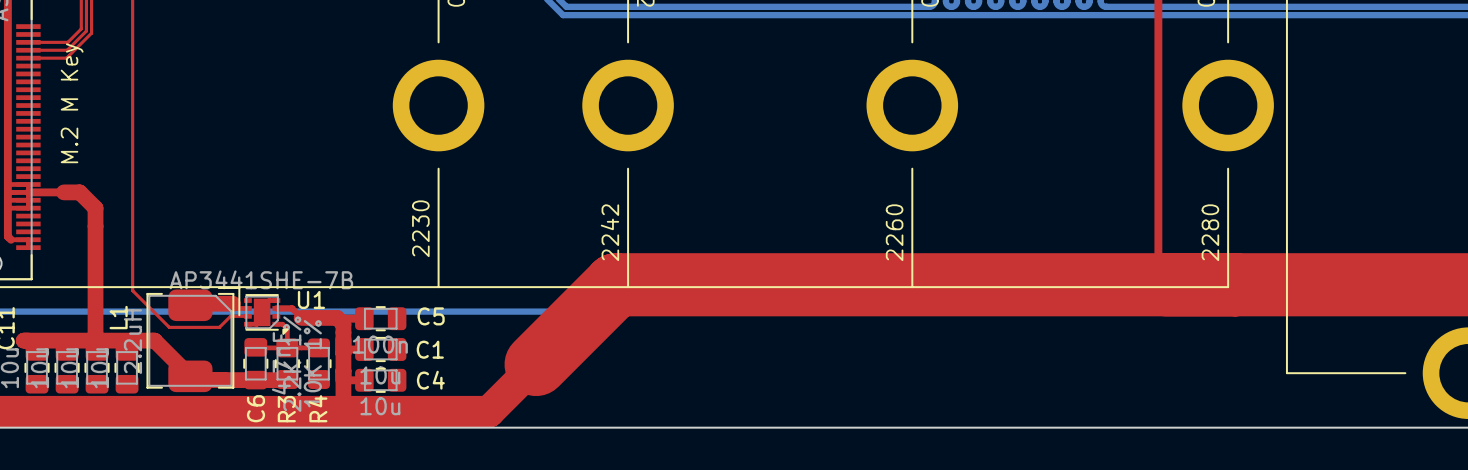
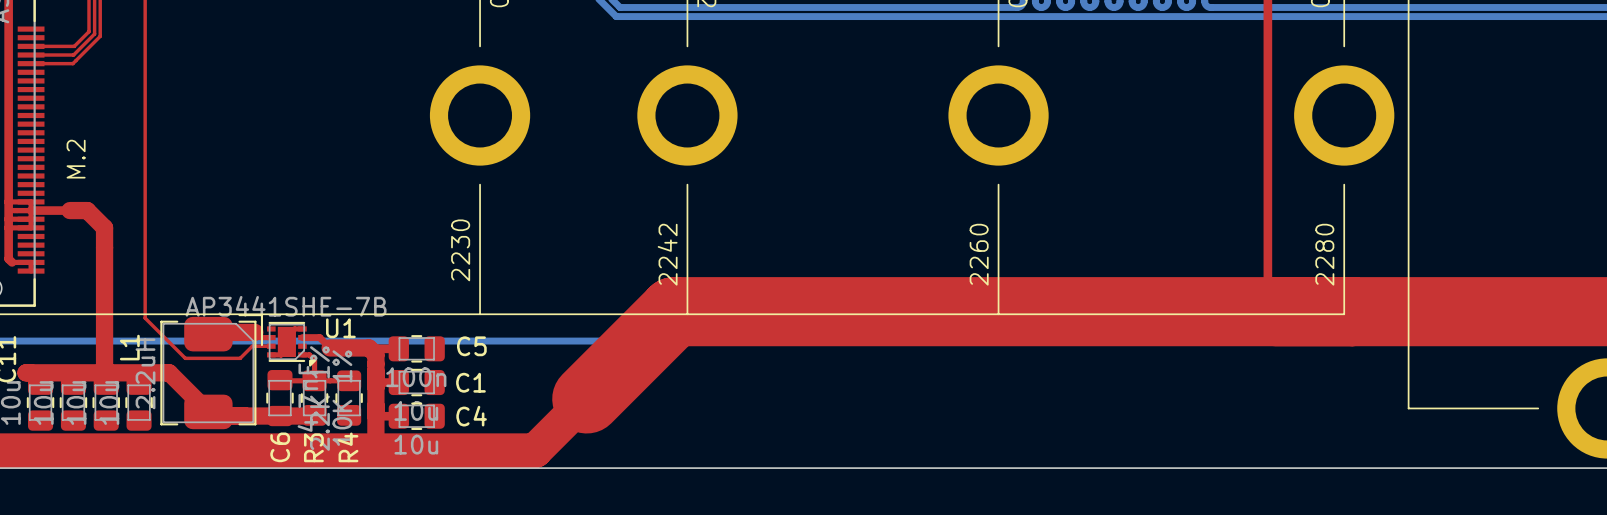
part text: M.2 M Key (72, 103) -> M.2 (76, 159)

